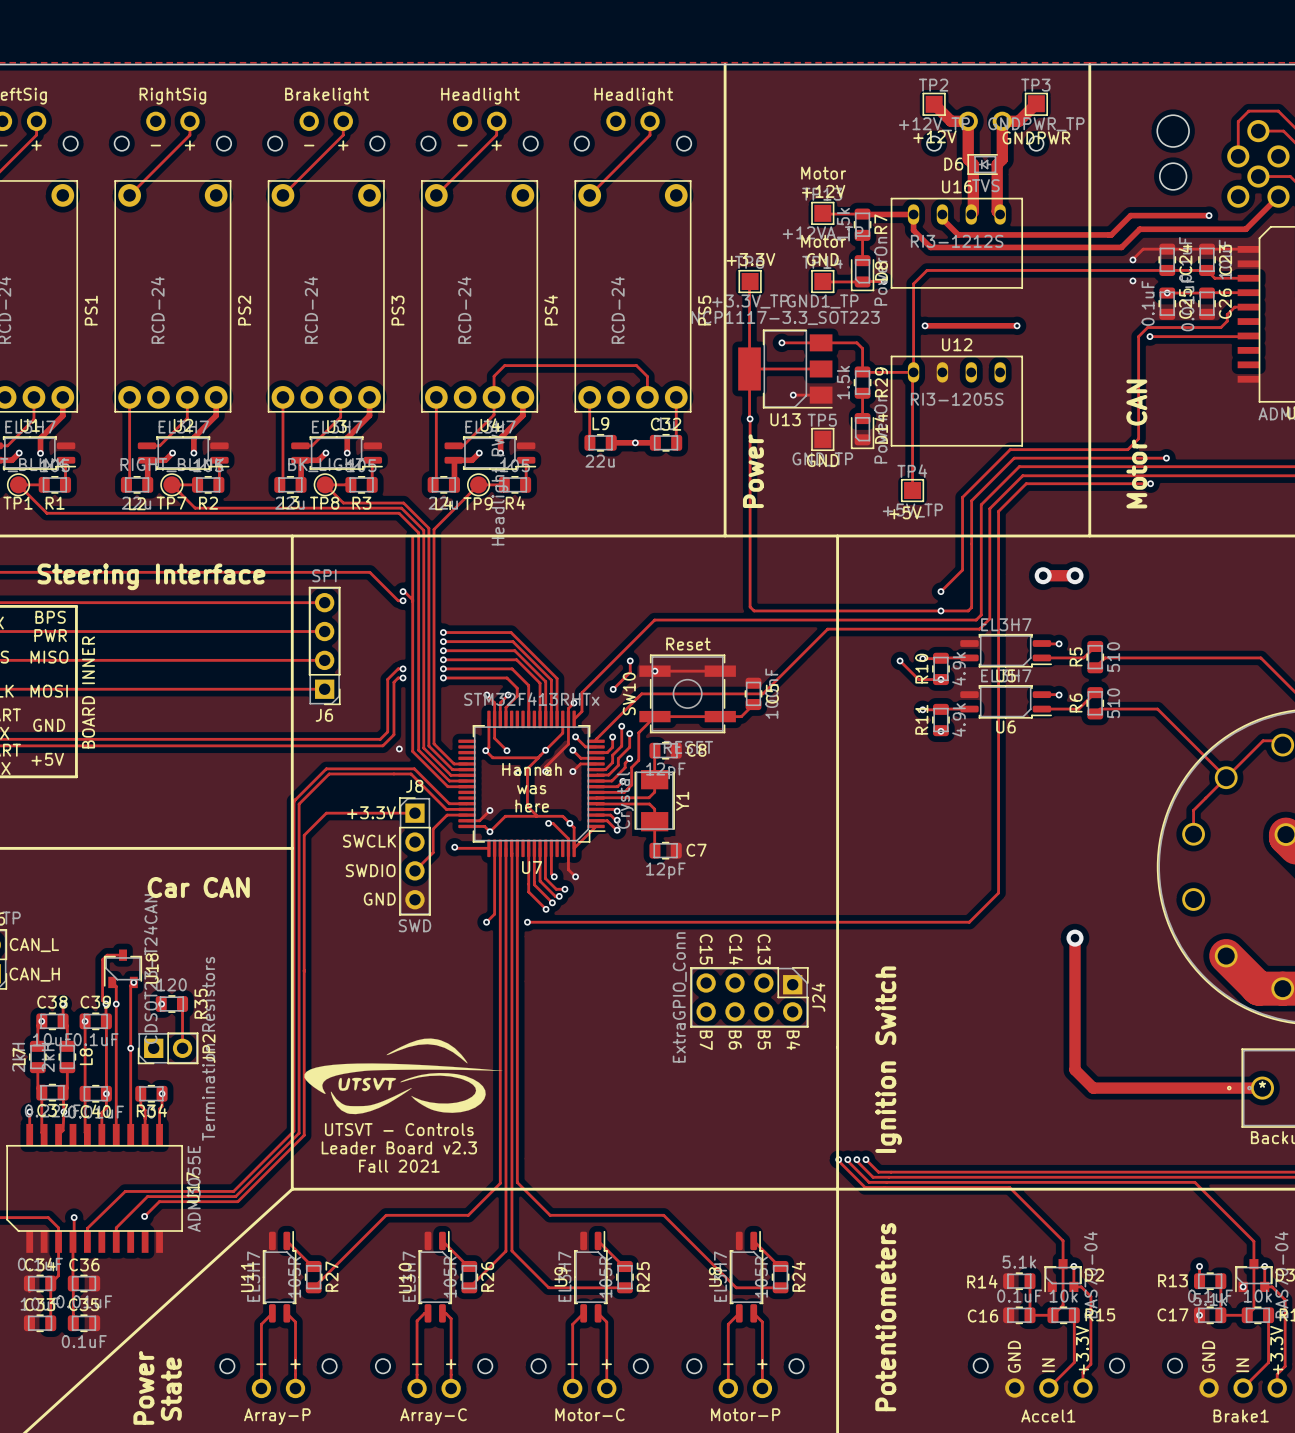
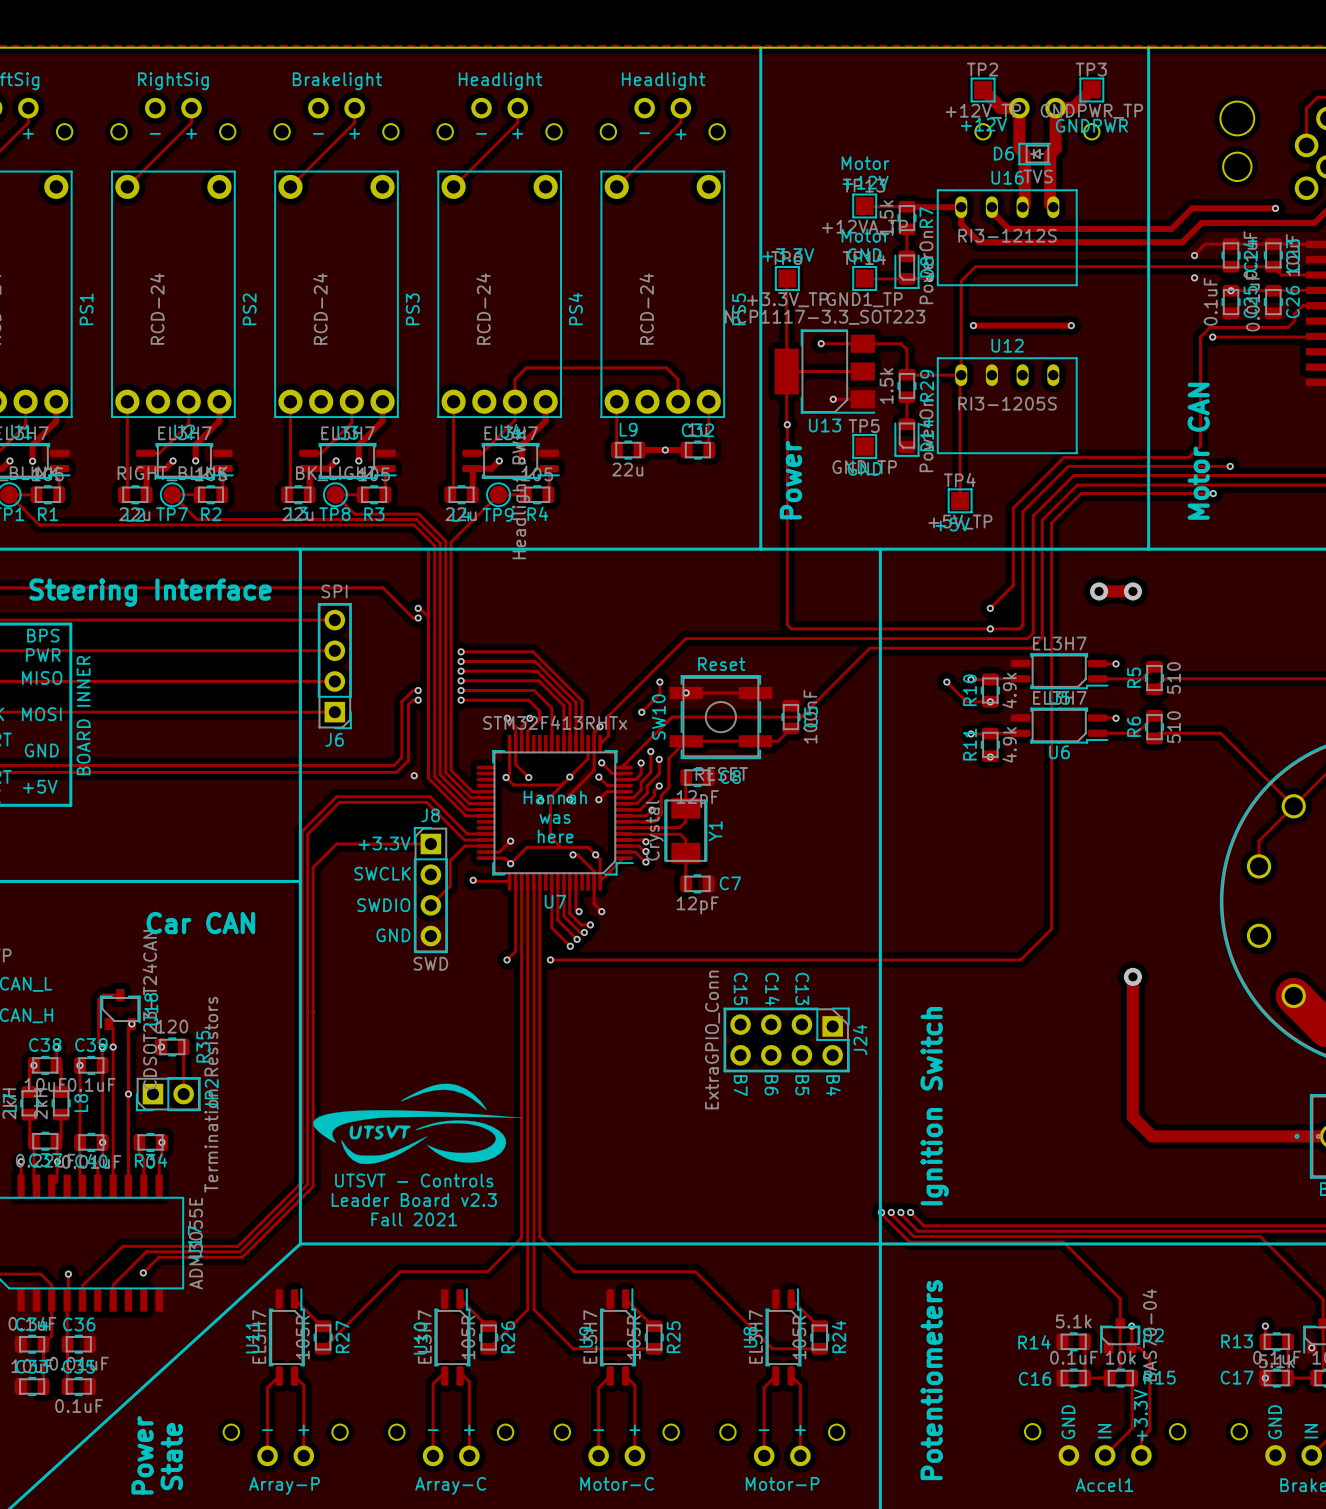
text: none -> - (644, 133)
text: none -> + (681, 134)

